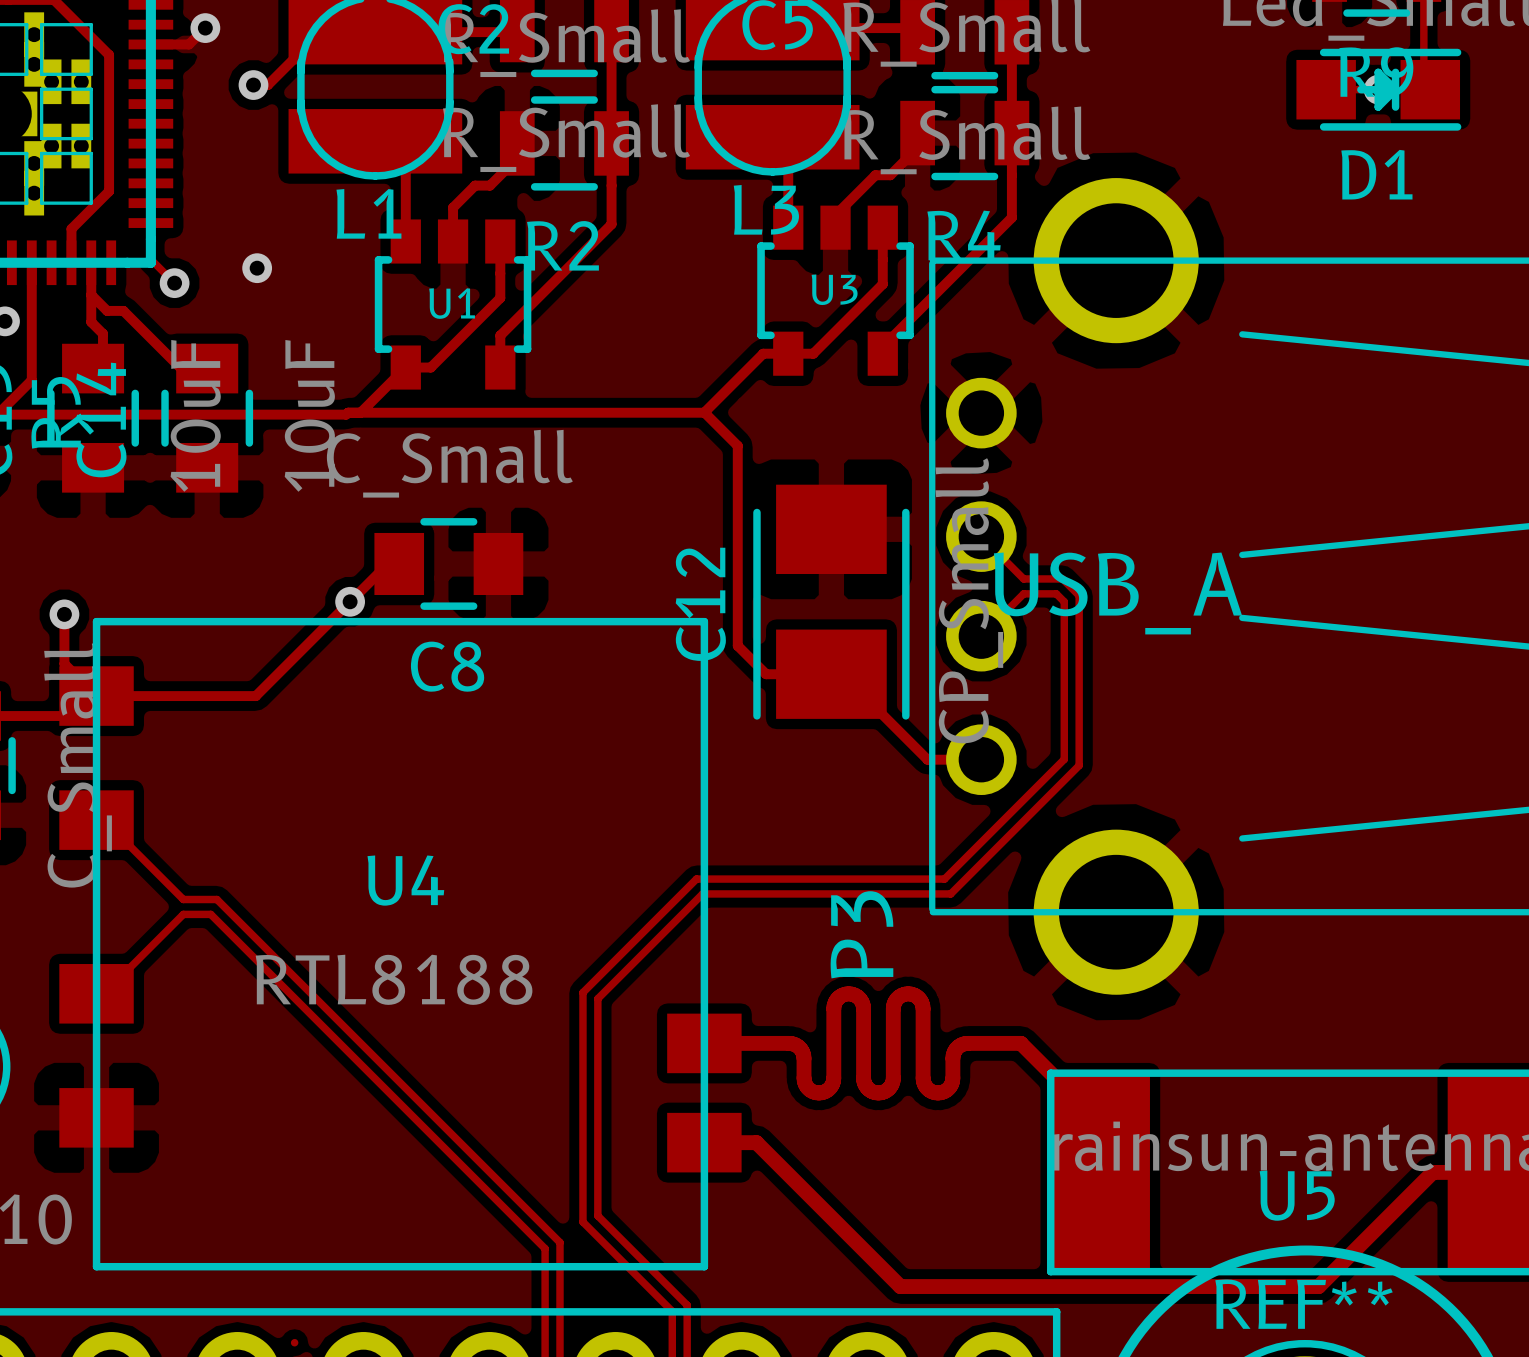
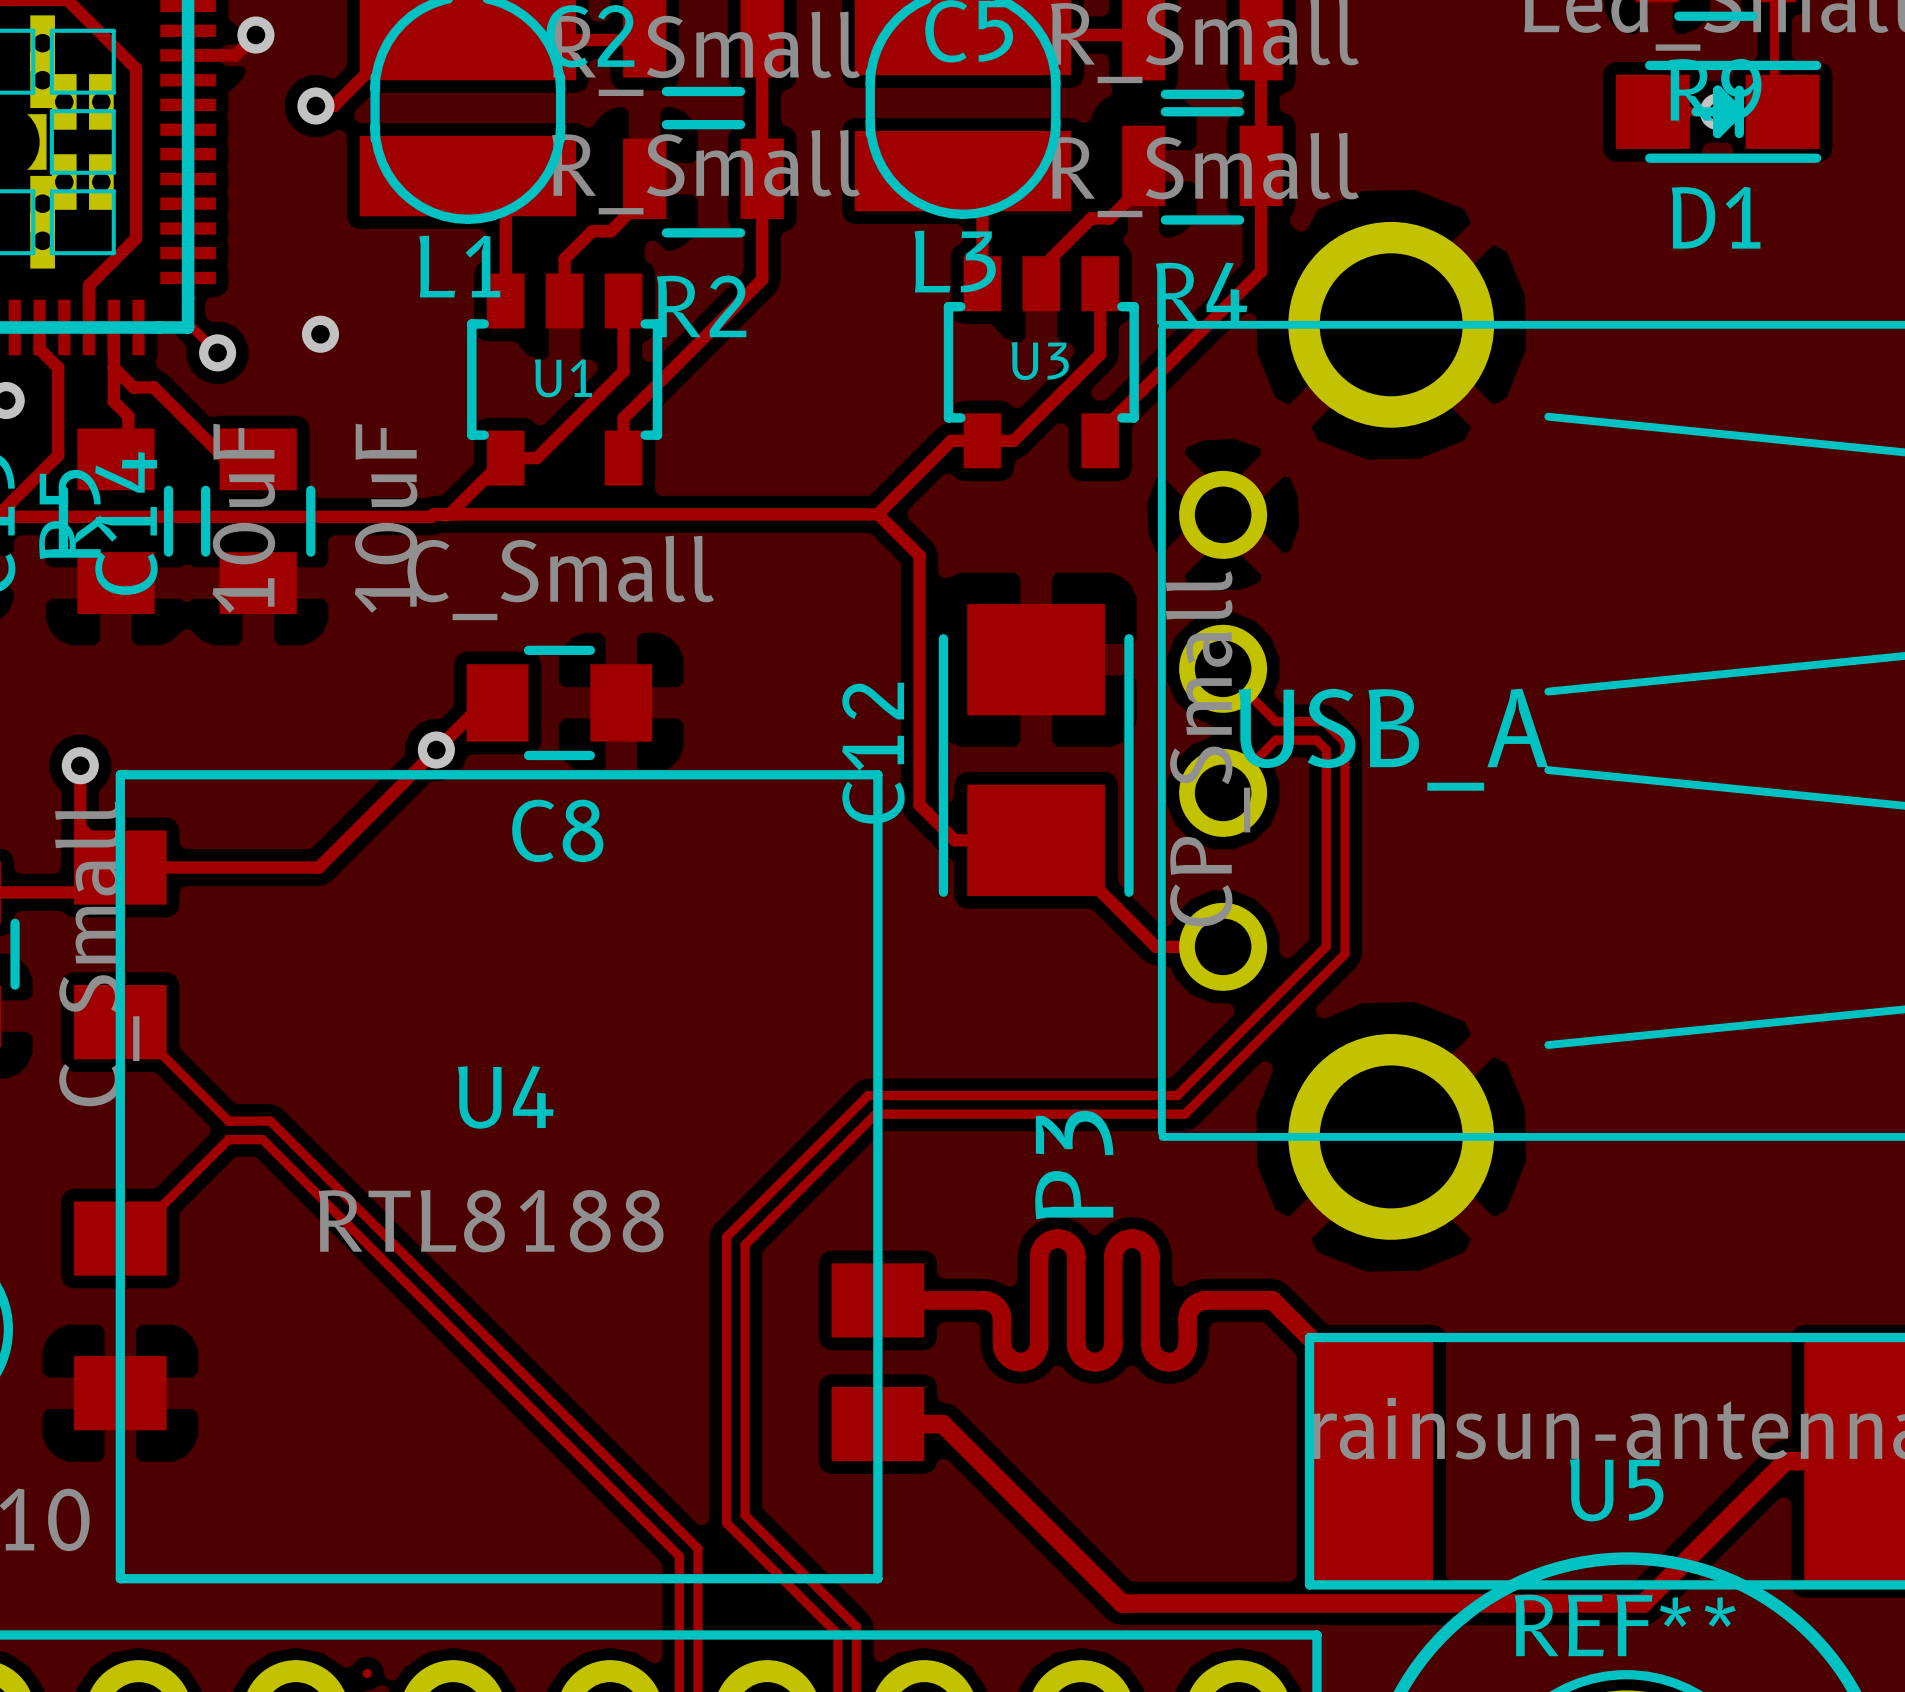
track: (31, 280) (31, 380) -> (39, 349) (58, 367) (58, 455) (39, 473)

